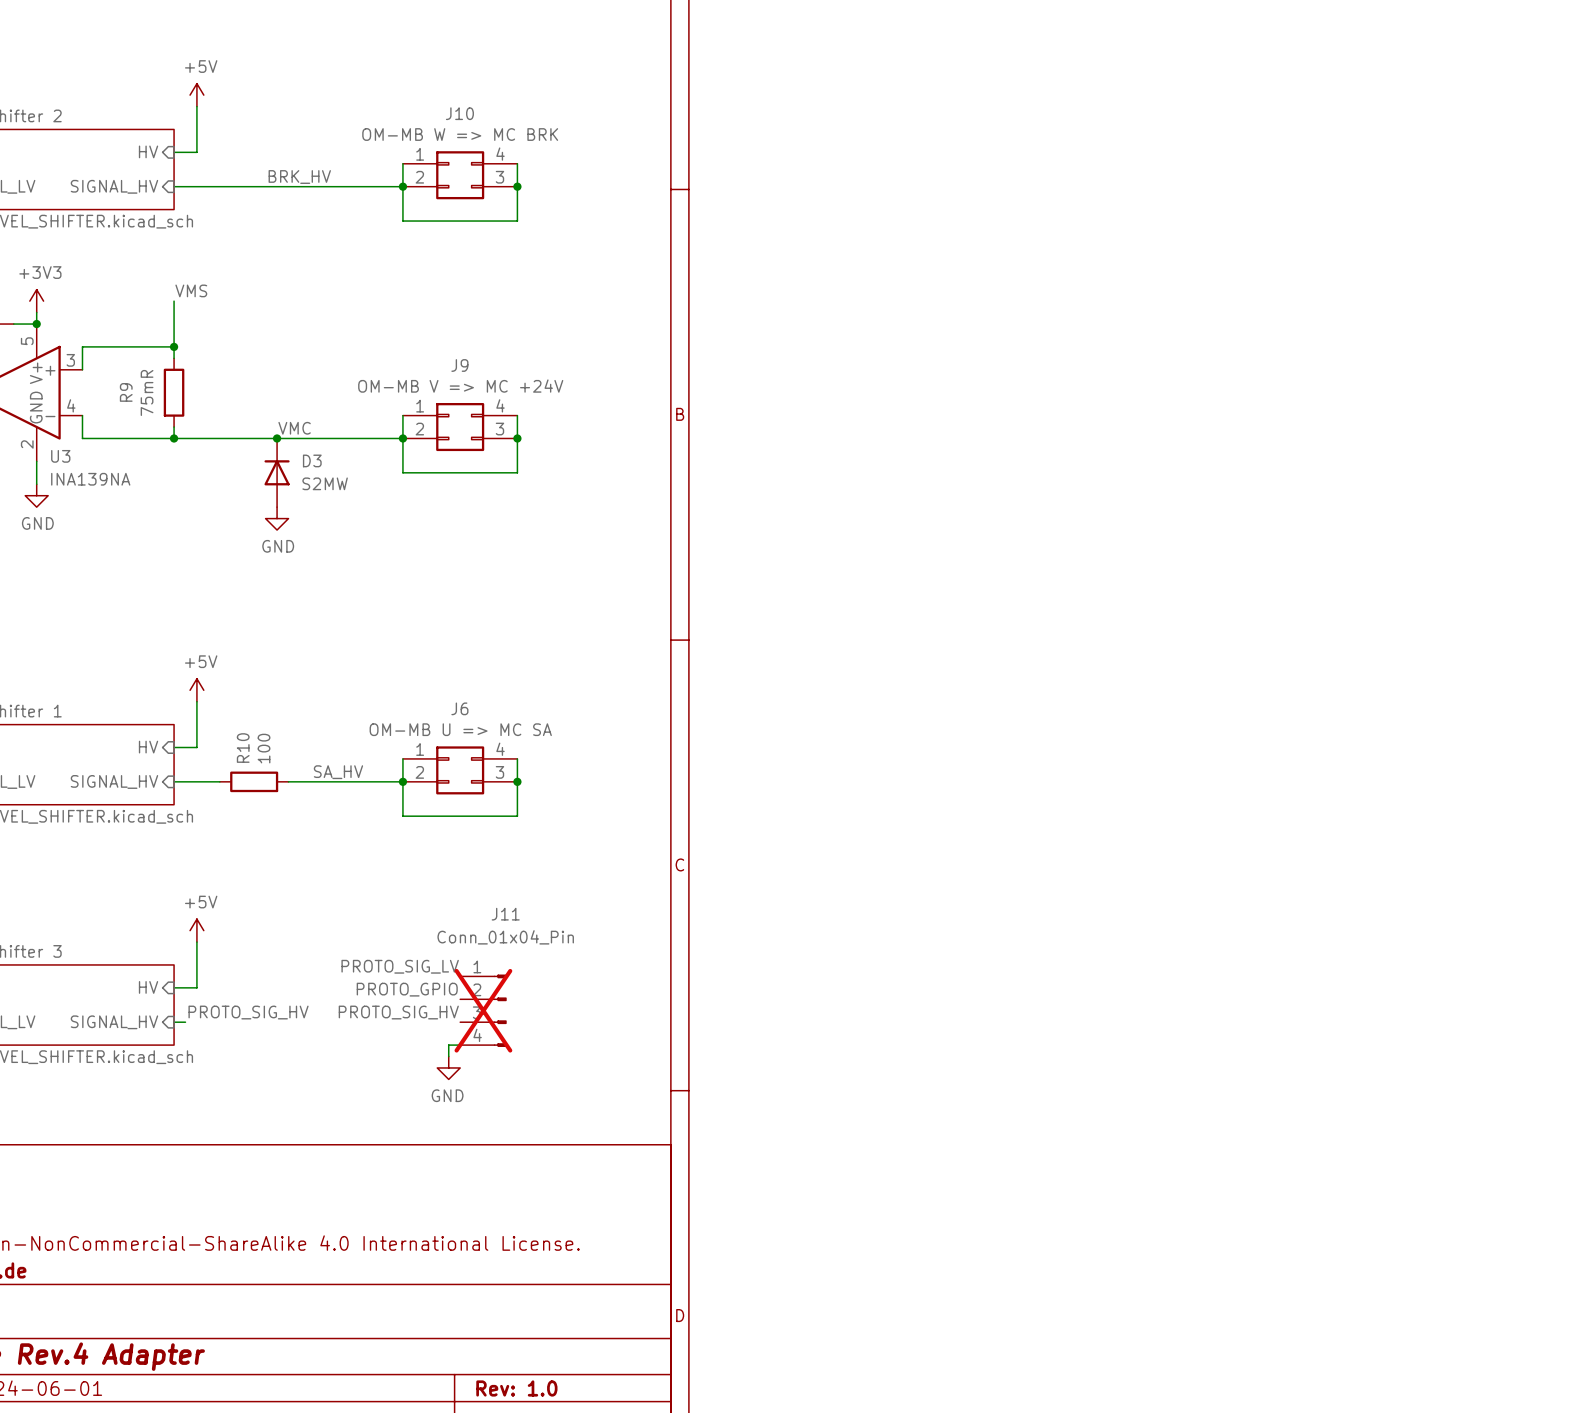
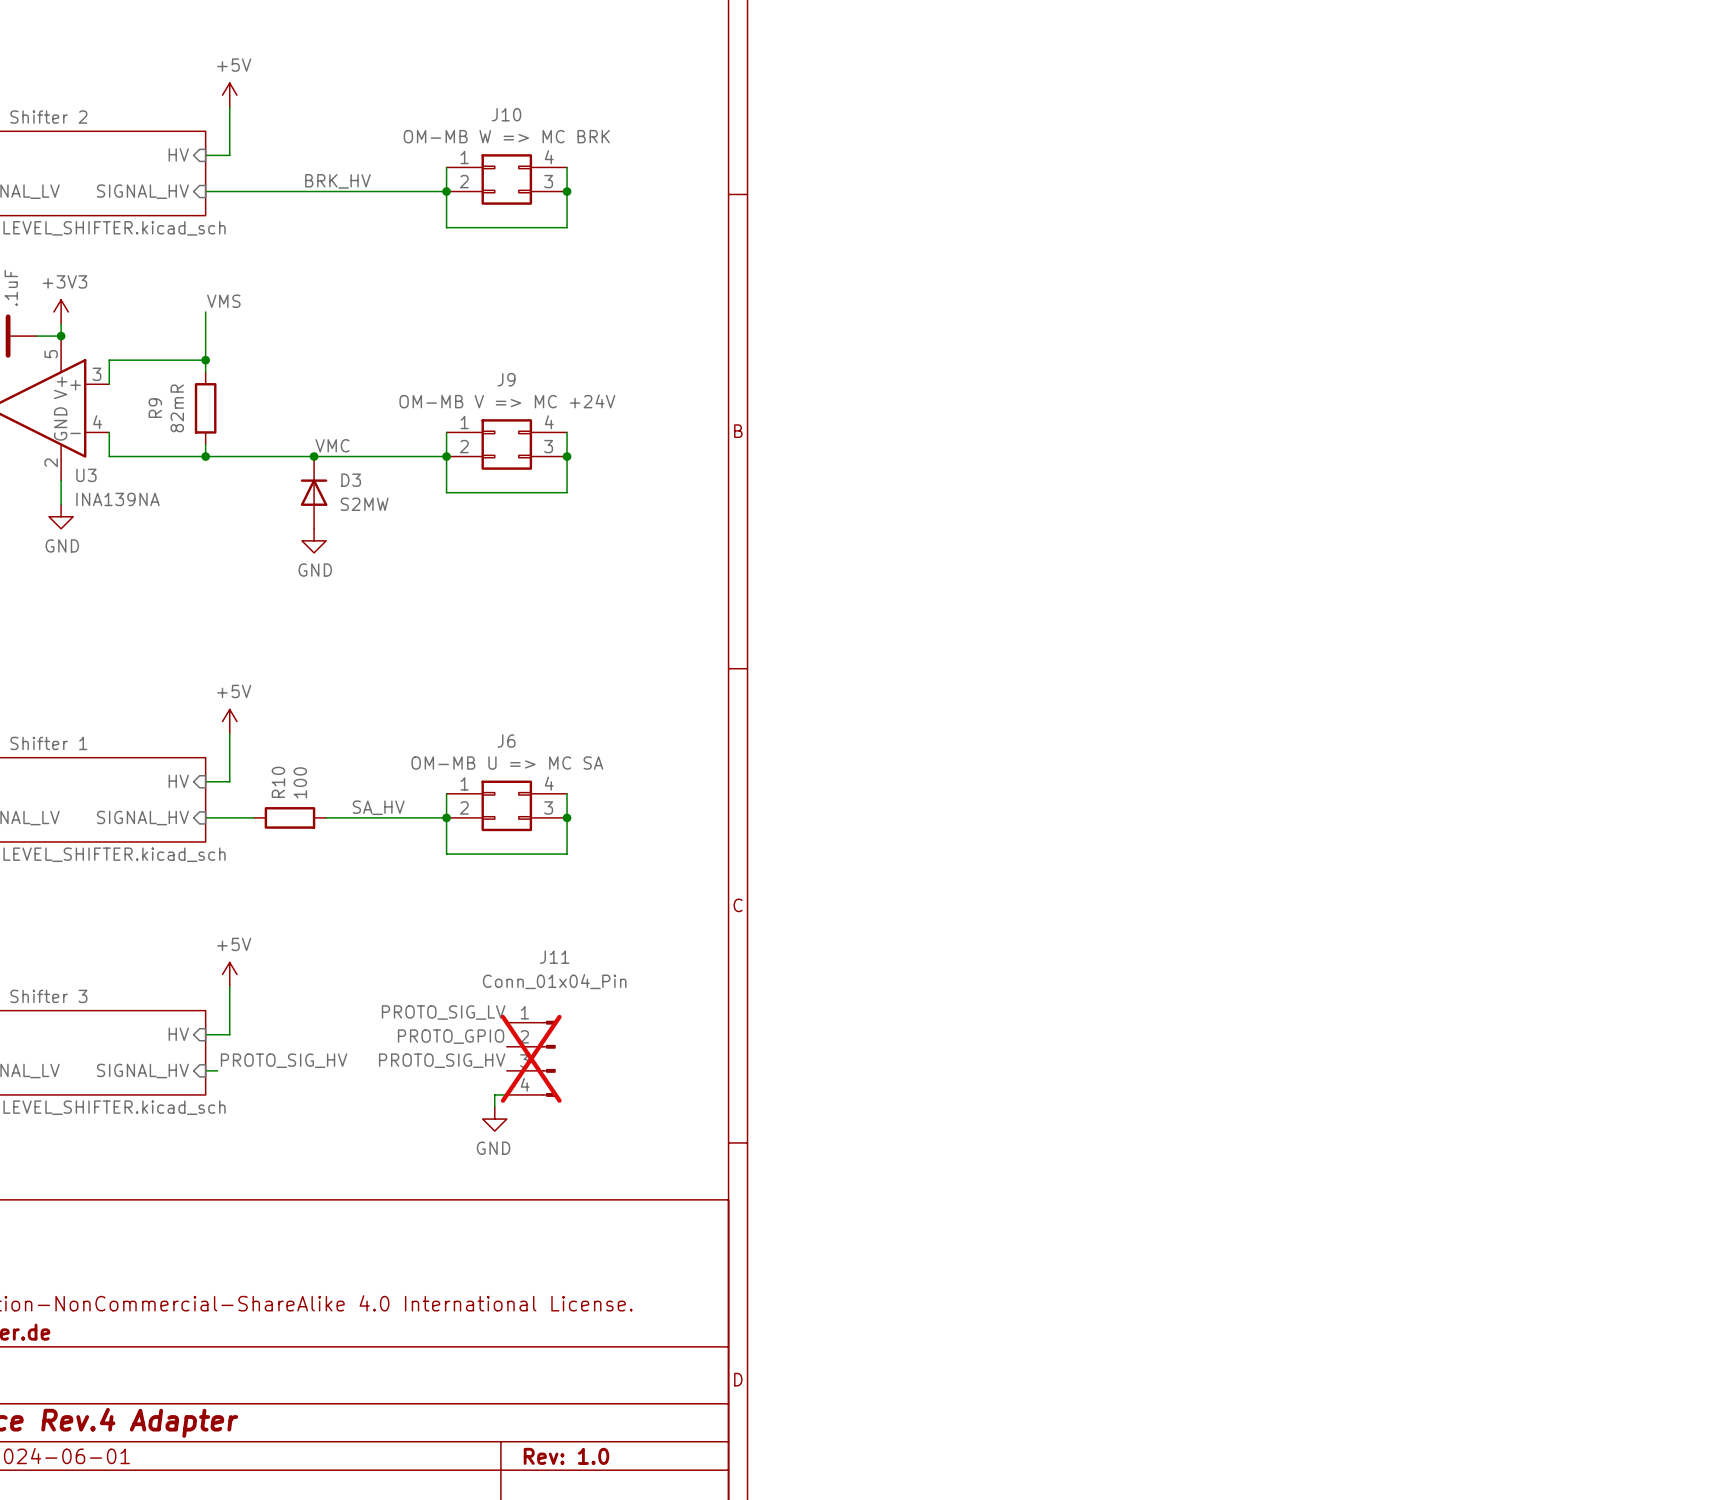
R9 value: 75mR (147, 392) -> 82mR (177, 408)

